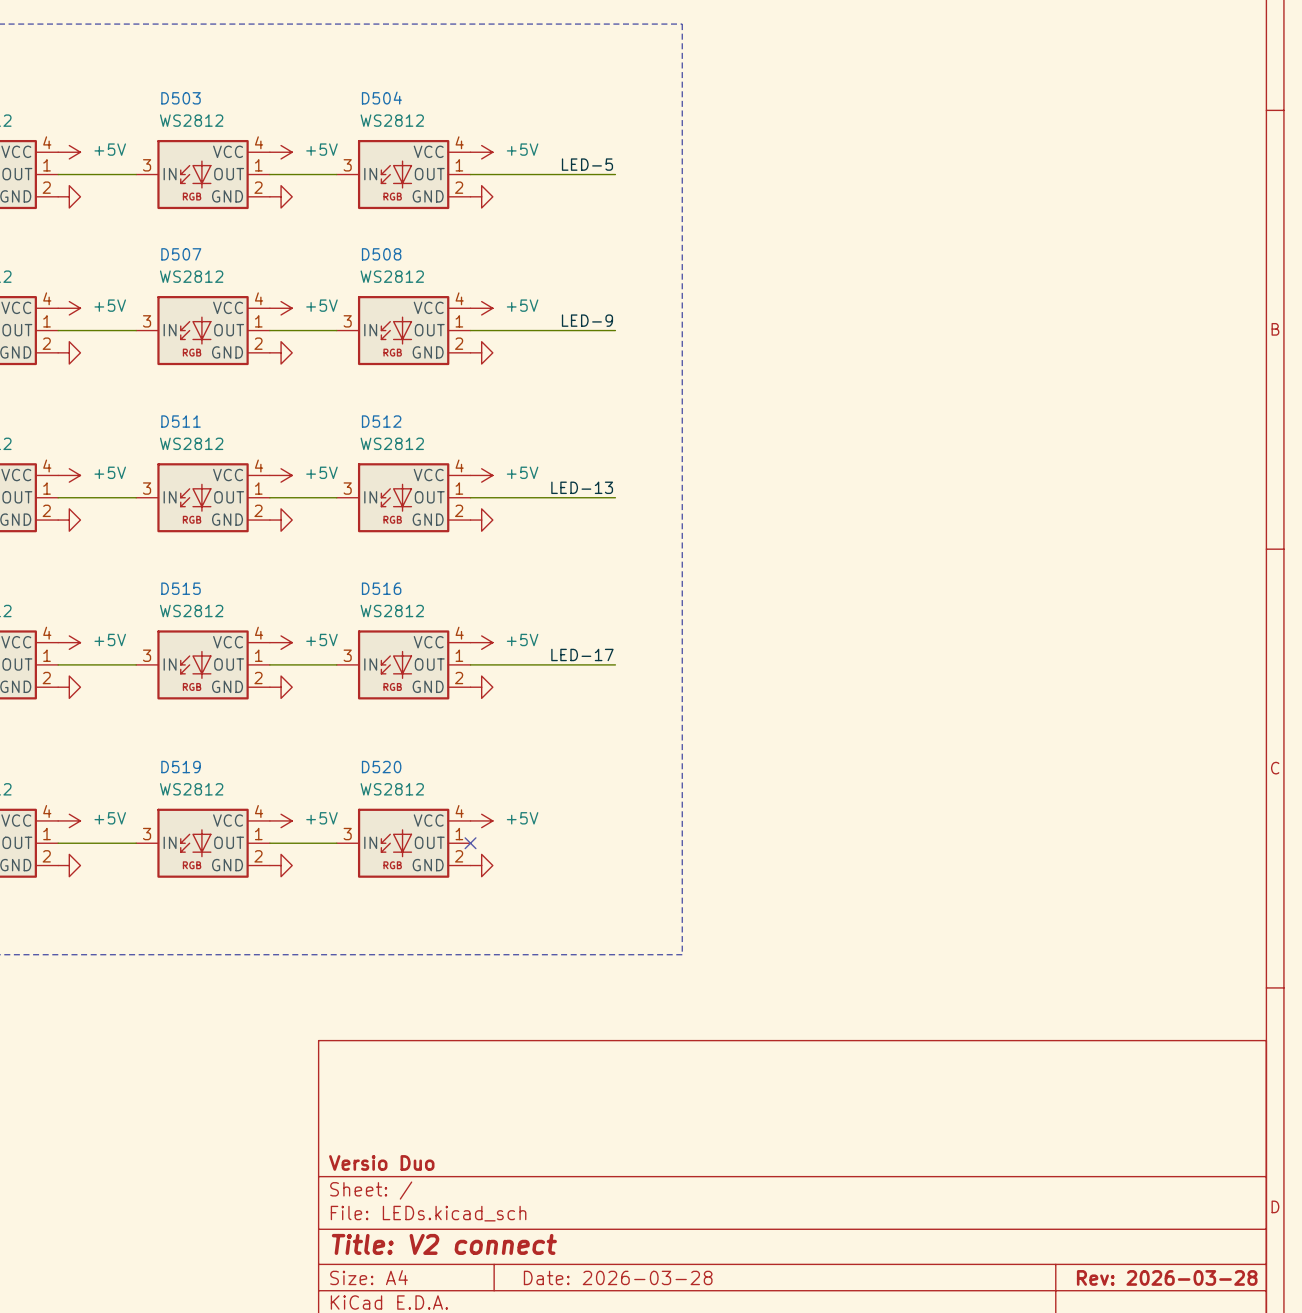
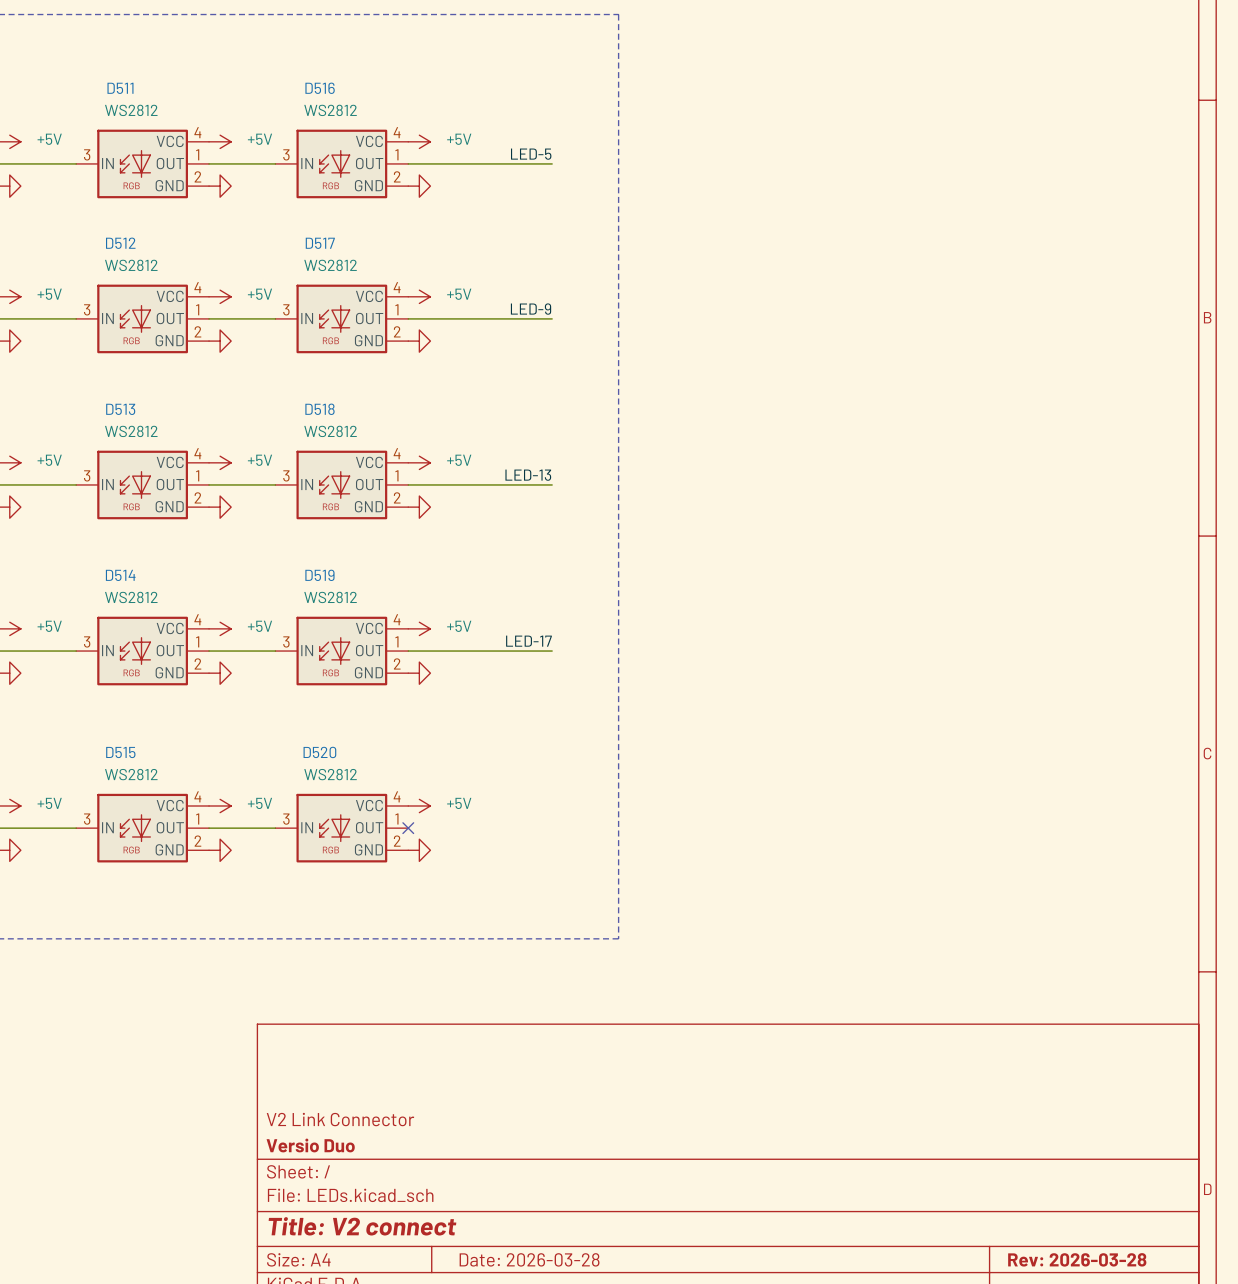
D503 name: D503 (181, 98) -> D511 (120, 88)
D504 name: D504 (381, 98) -> D516 (320, 88)
D507 name: D507 (181, 254) -> D512 (120, 243)
D508 name: D508 (381, 254) -> D517 (320, 243)
D511 name: D511 (181, 421) -> D513 (120, 409)
D512 name: D512 (381, 421) -> D518 (319, 409)
D515 name: D515 (181, 588) -> D514 (120, 575)
D516 name: D516 (381, 588) -> D519 (319, 575)
D519 name: D519 (181, 767) -> D515 (120, 752)
title block: none -> V2 Link Connector (340, 1119)

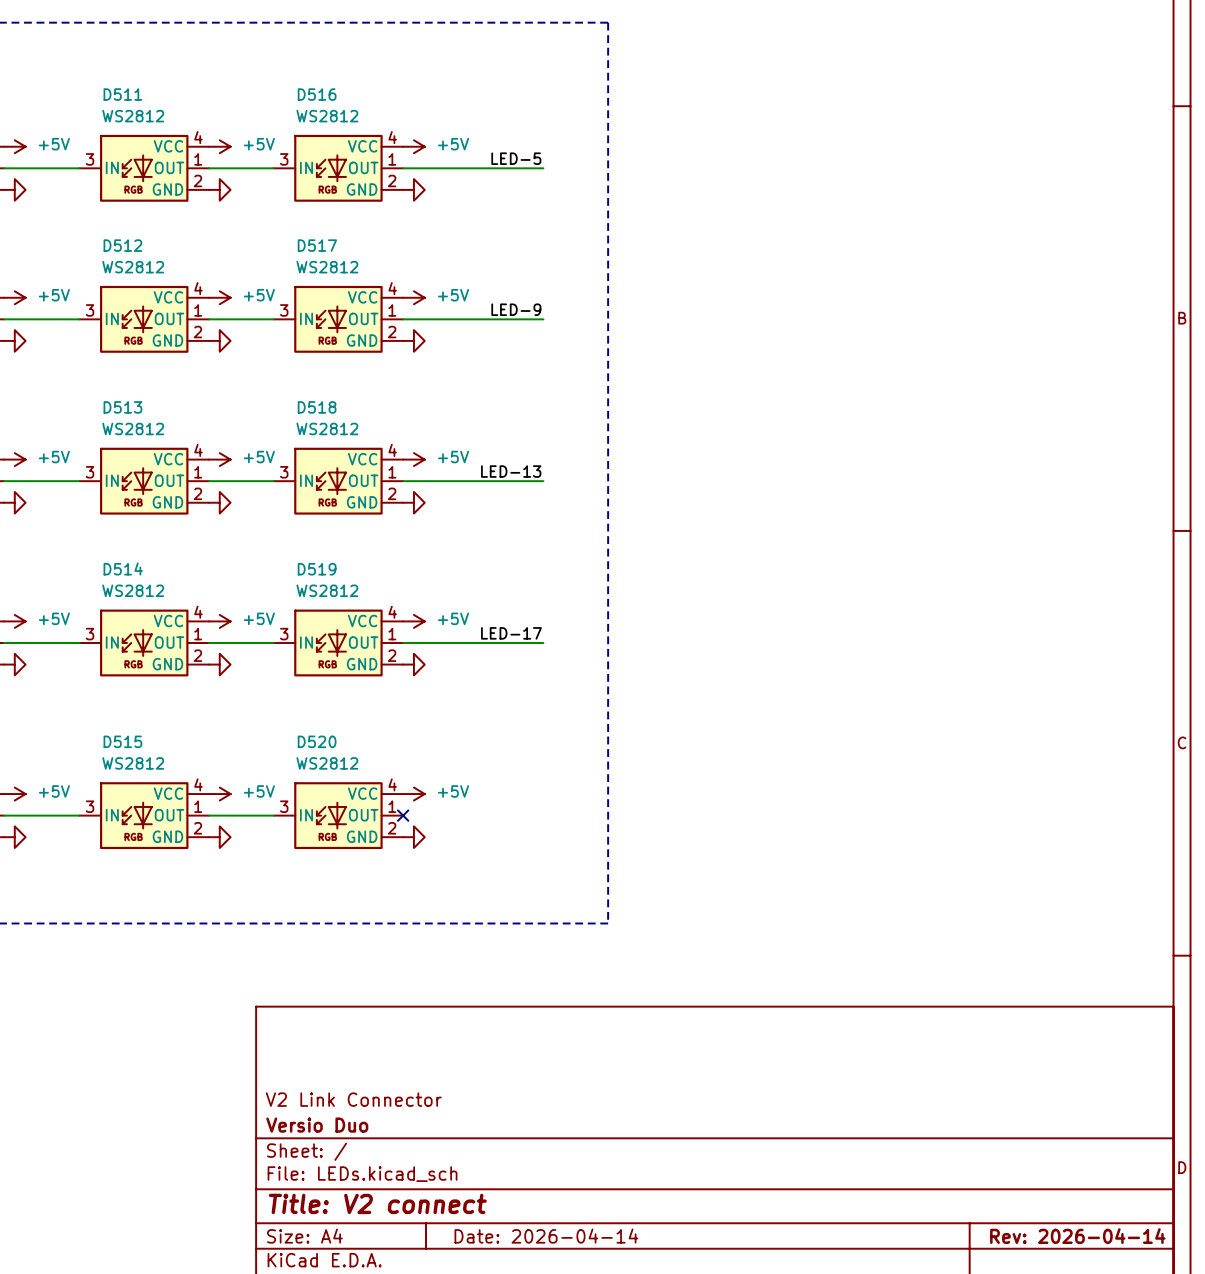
title block: Date: 2026-03-28 (529, 1259) -> Date: 2026-04-14 (546, 1236)
title block: Rev: 2026-03-28 (1077, 1259) -> Rev: 2026-04-14 (1077, 1236)

